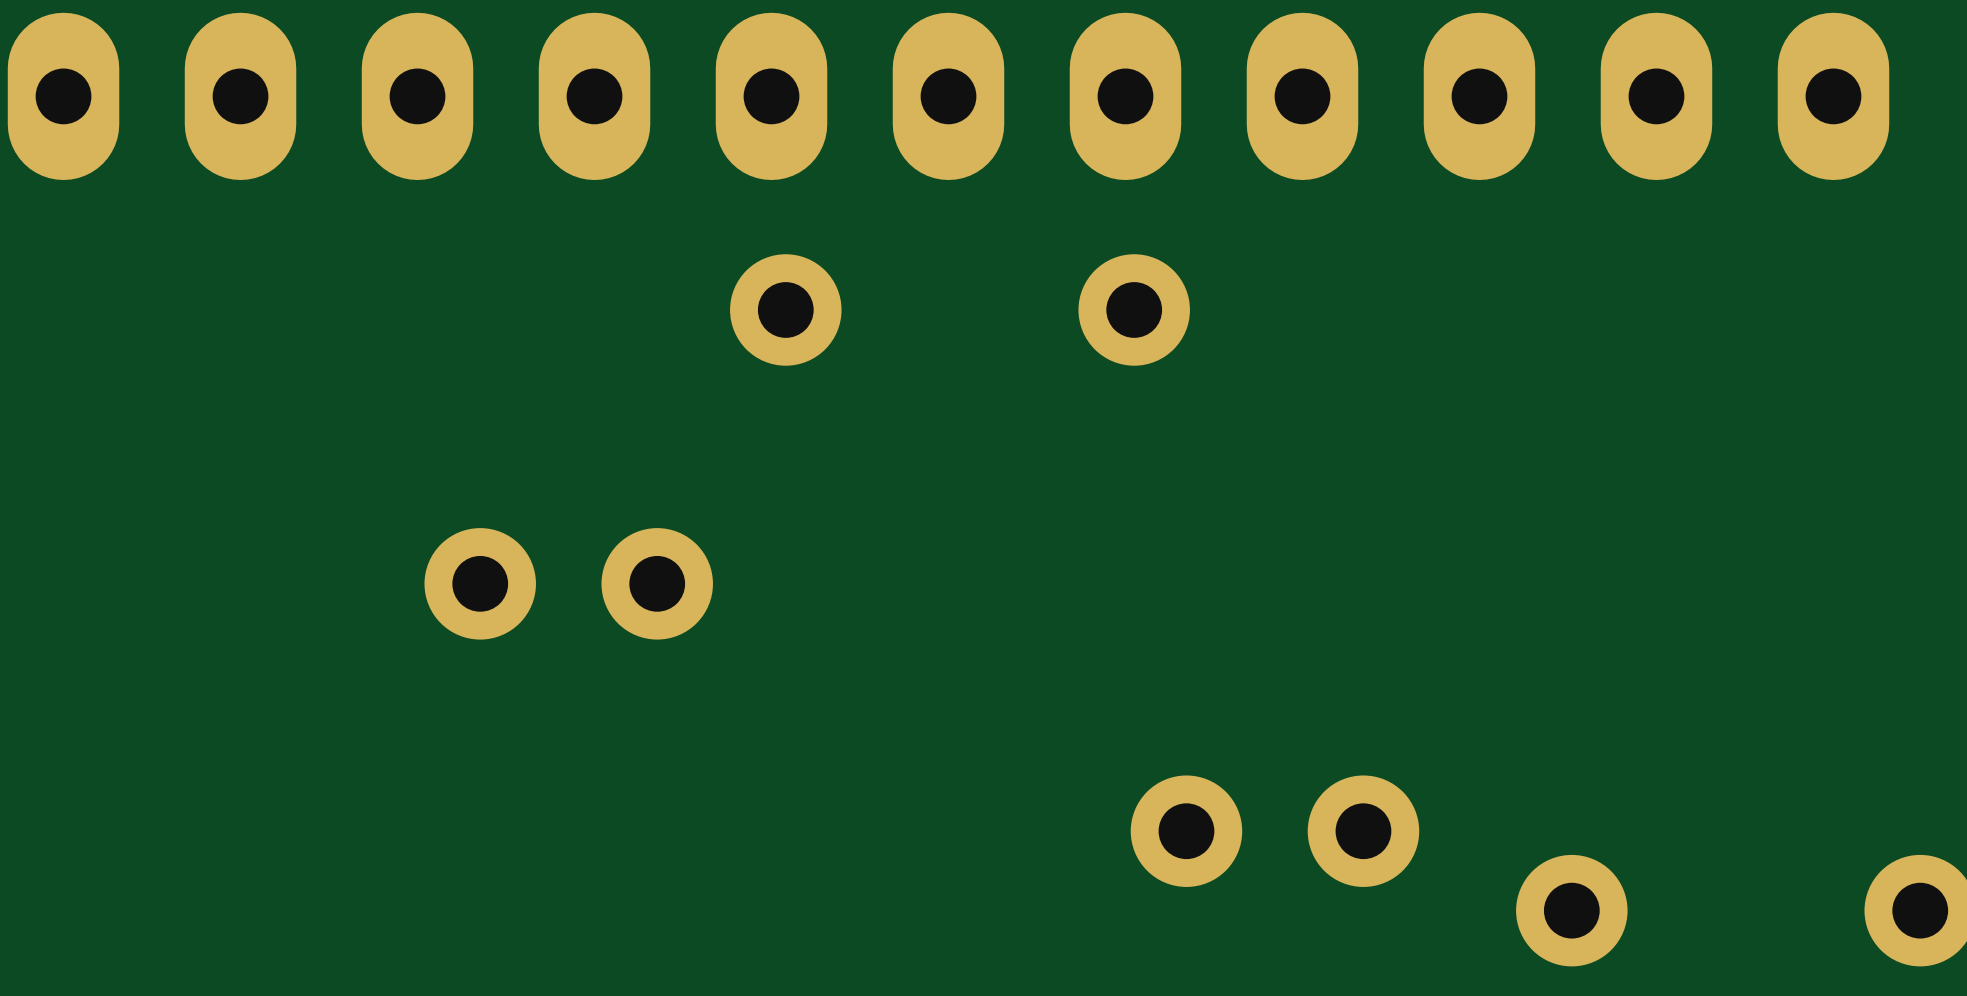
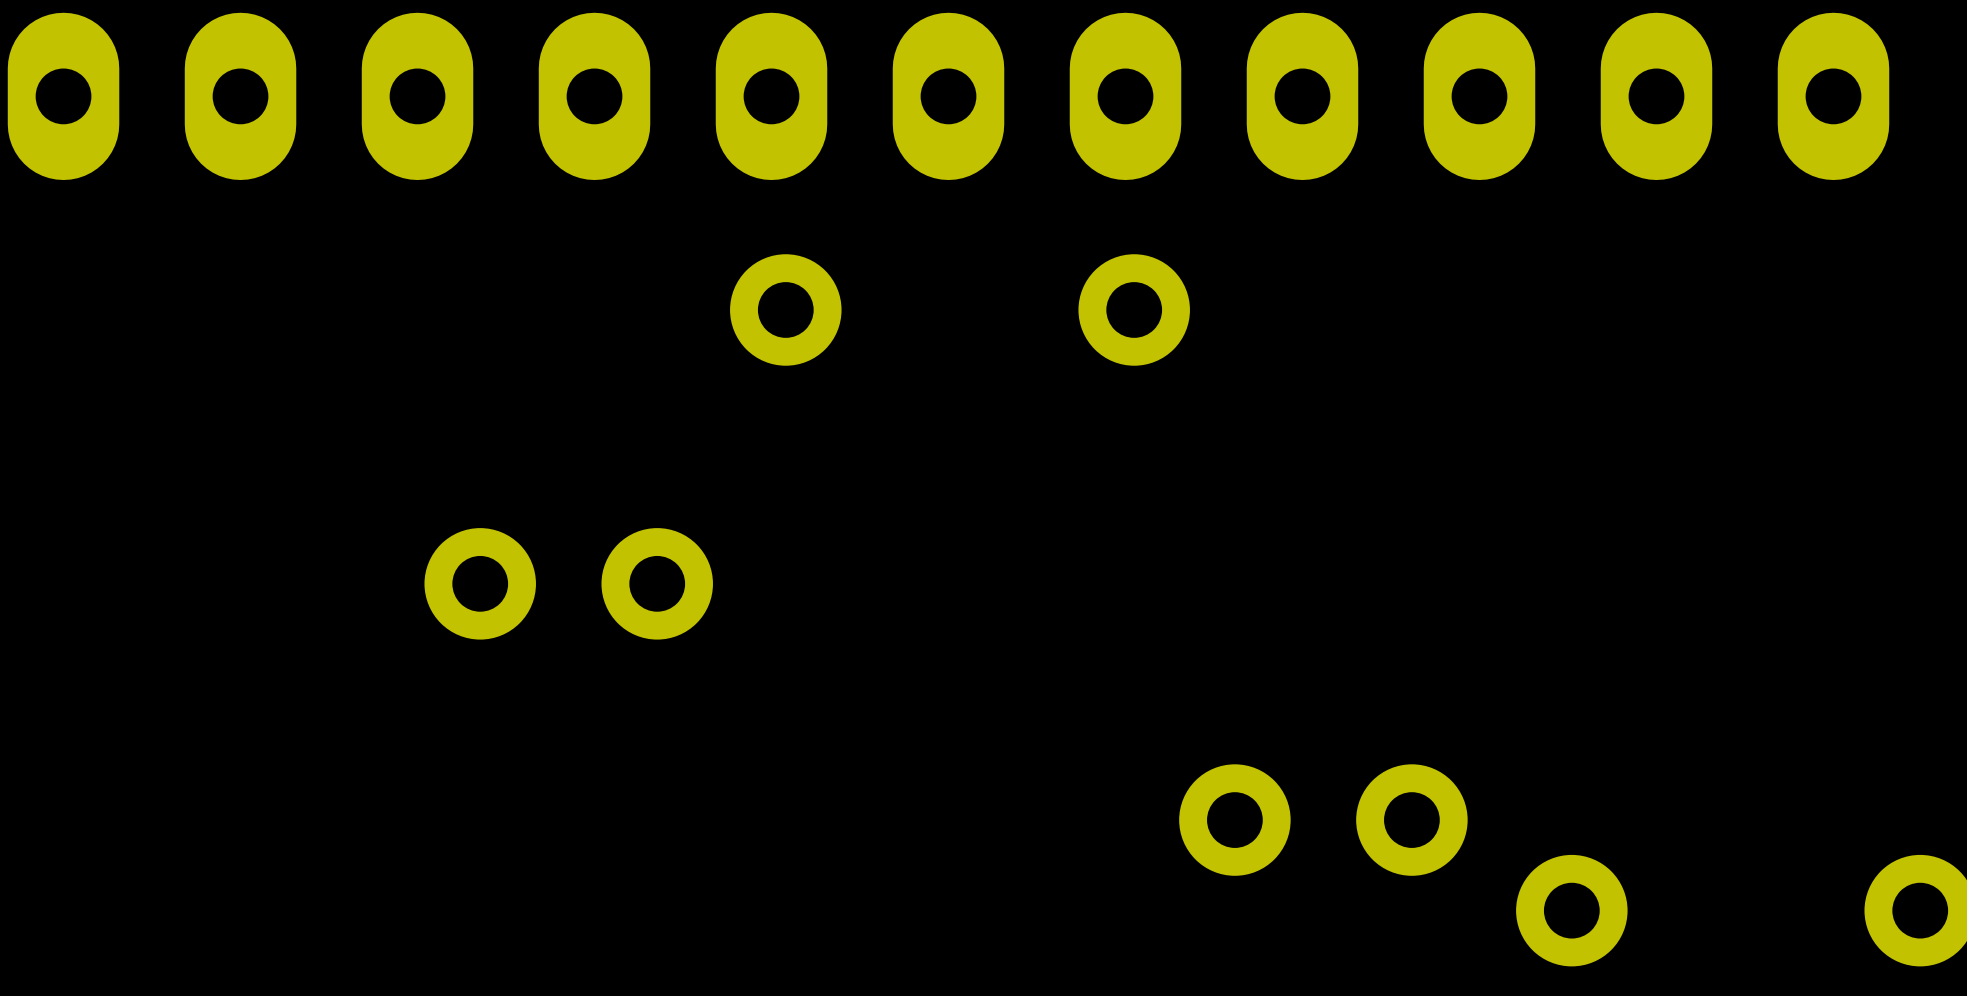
part position: (1274, 831) -> (1323, 820)

